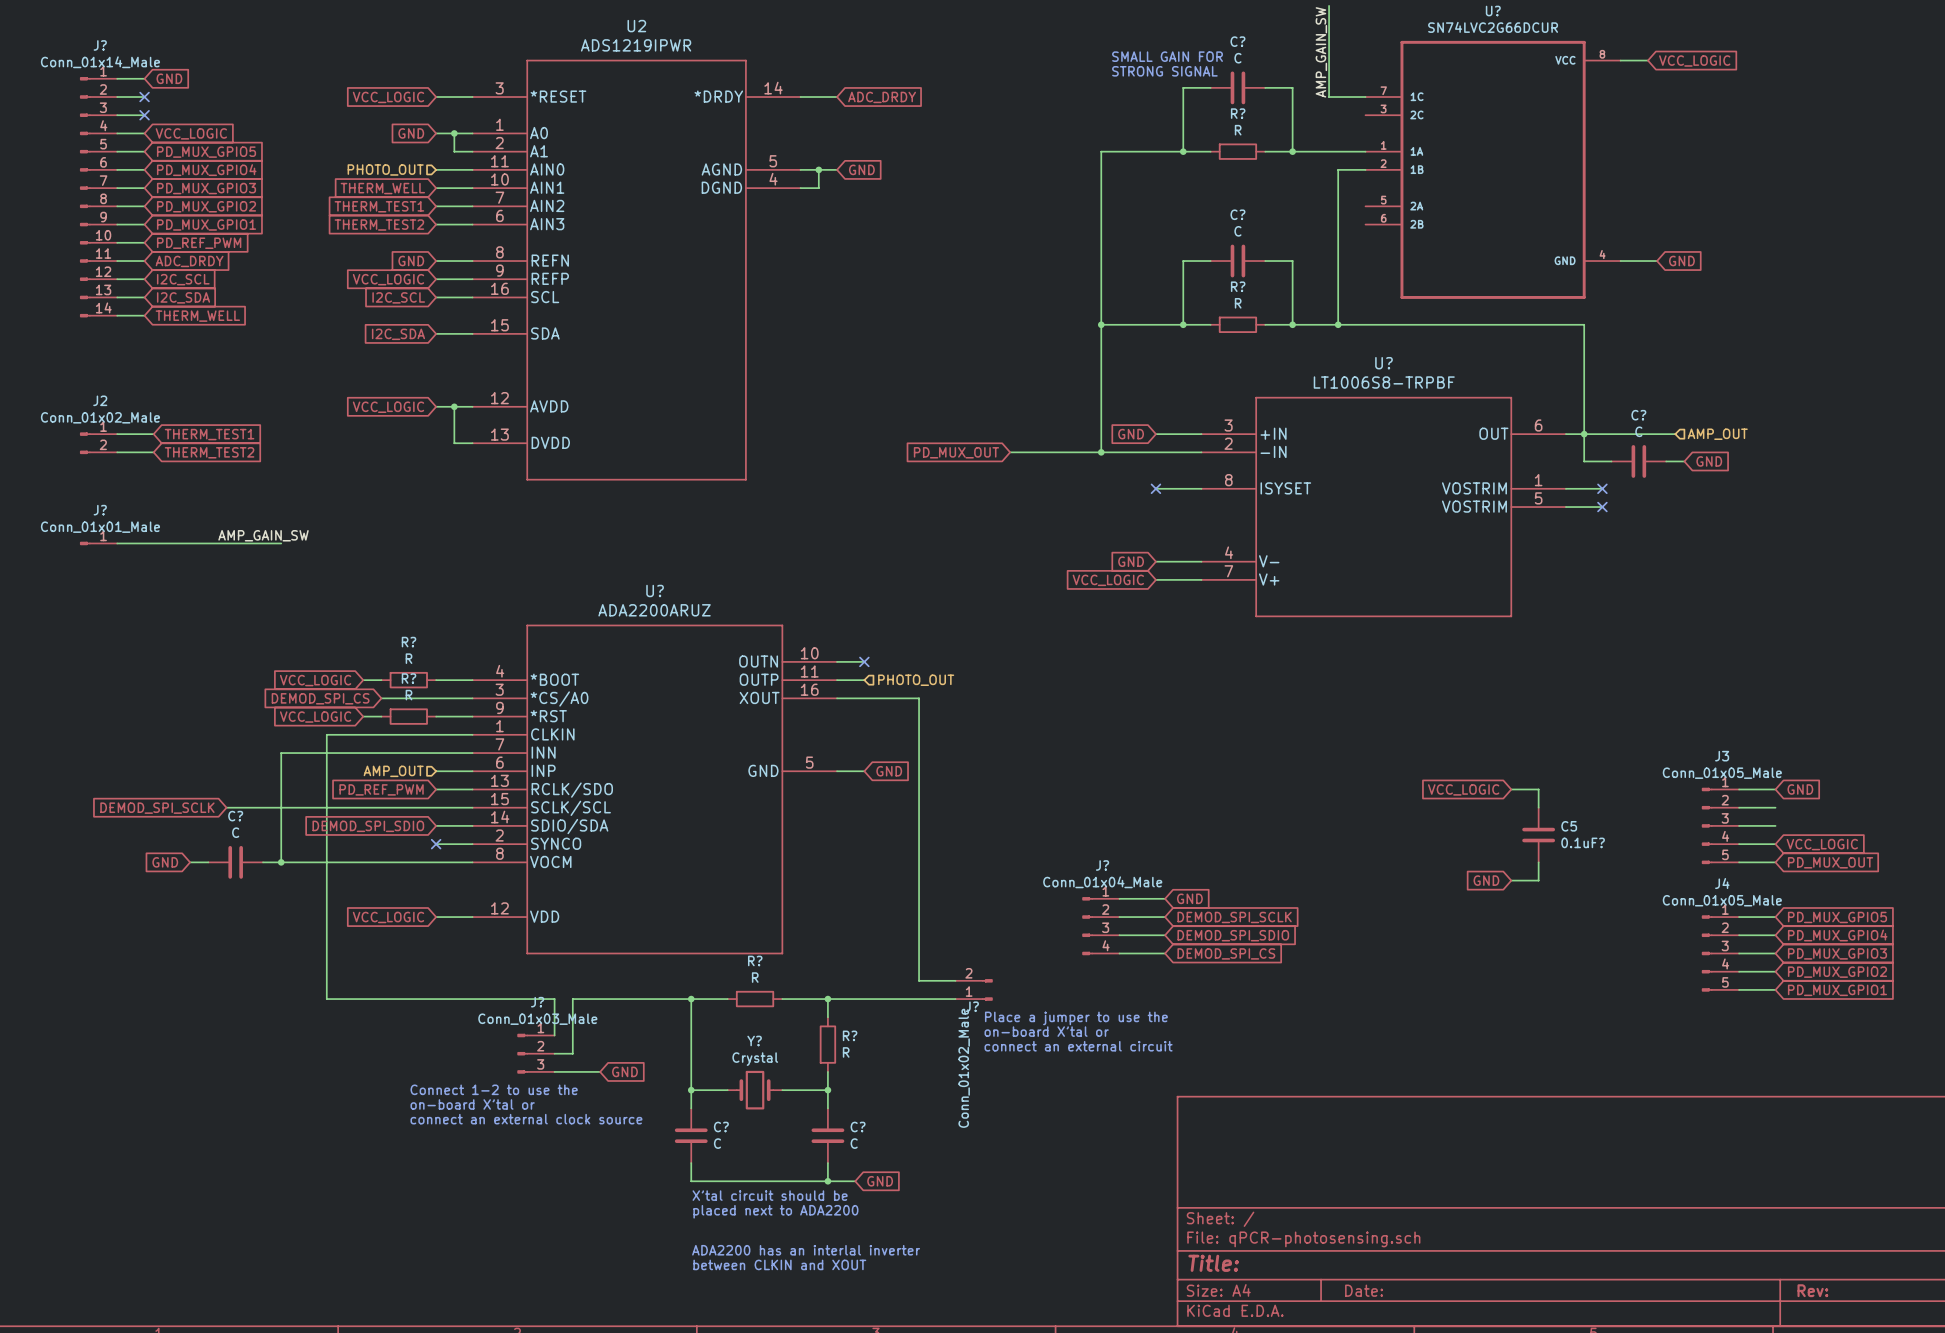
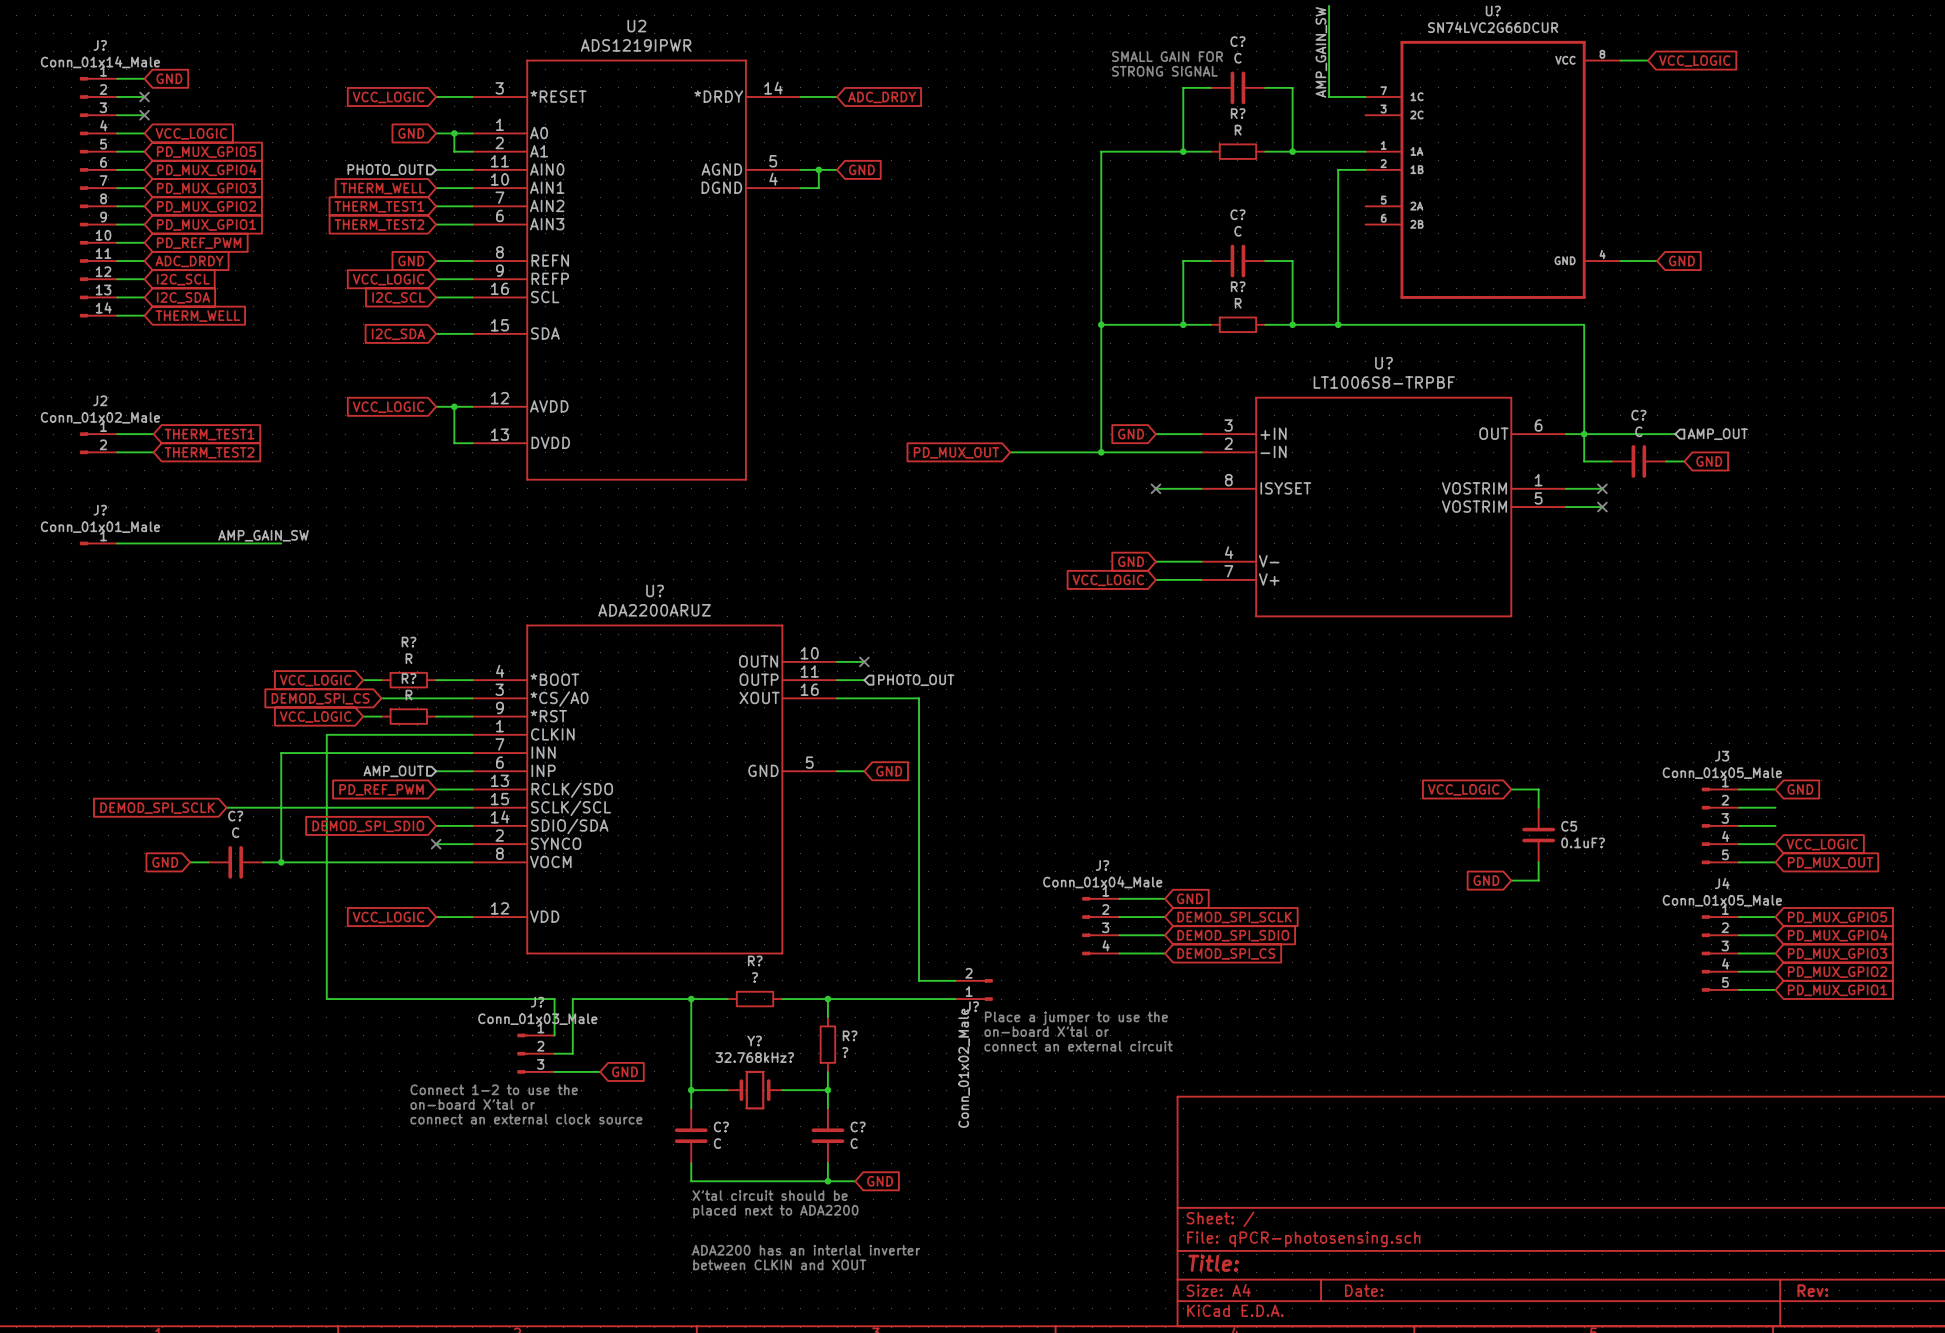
R? value: R (755, 977) -> ? (755, 977)
R? value: R (846, 1052) -> ? (845, 1052)
Y? value: Crystal (755, 1059) -> 32.768kHz? (754, 1057)

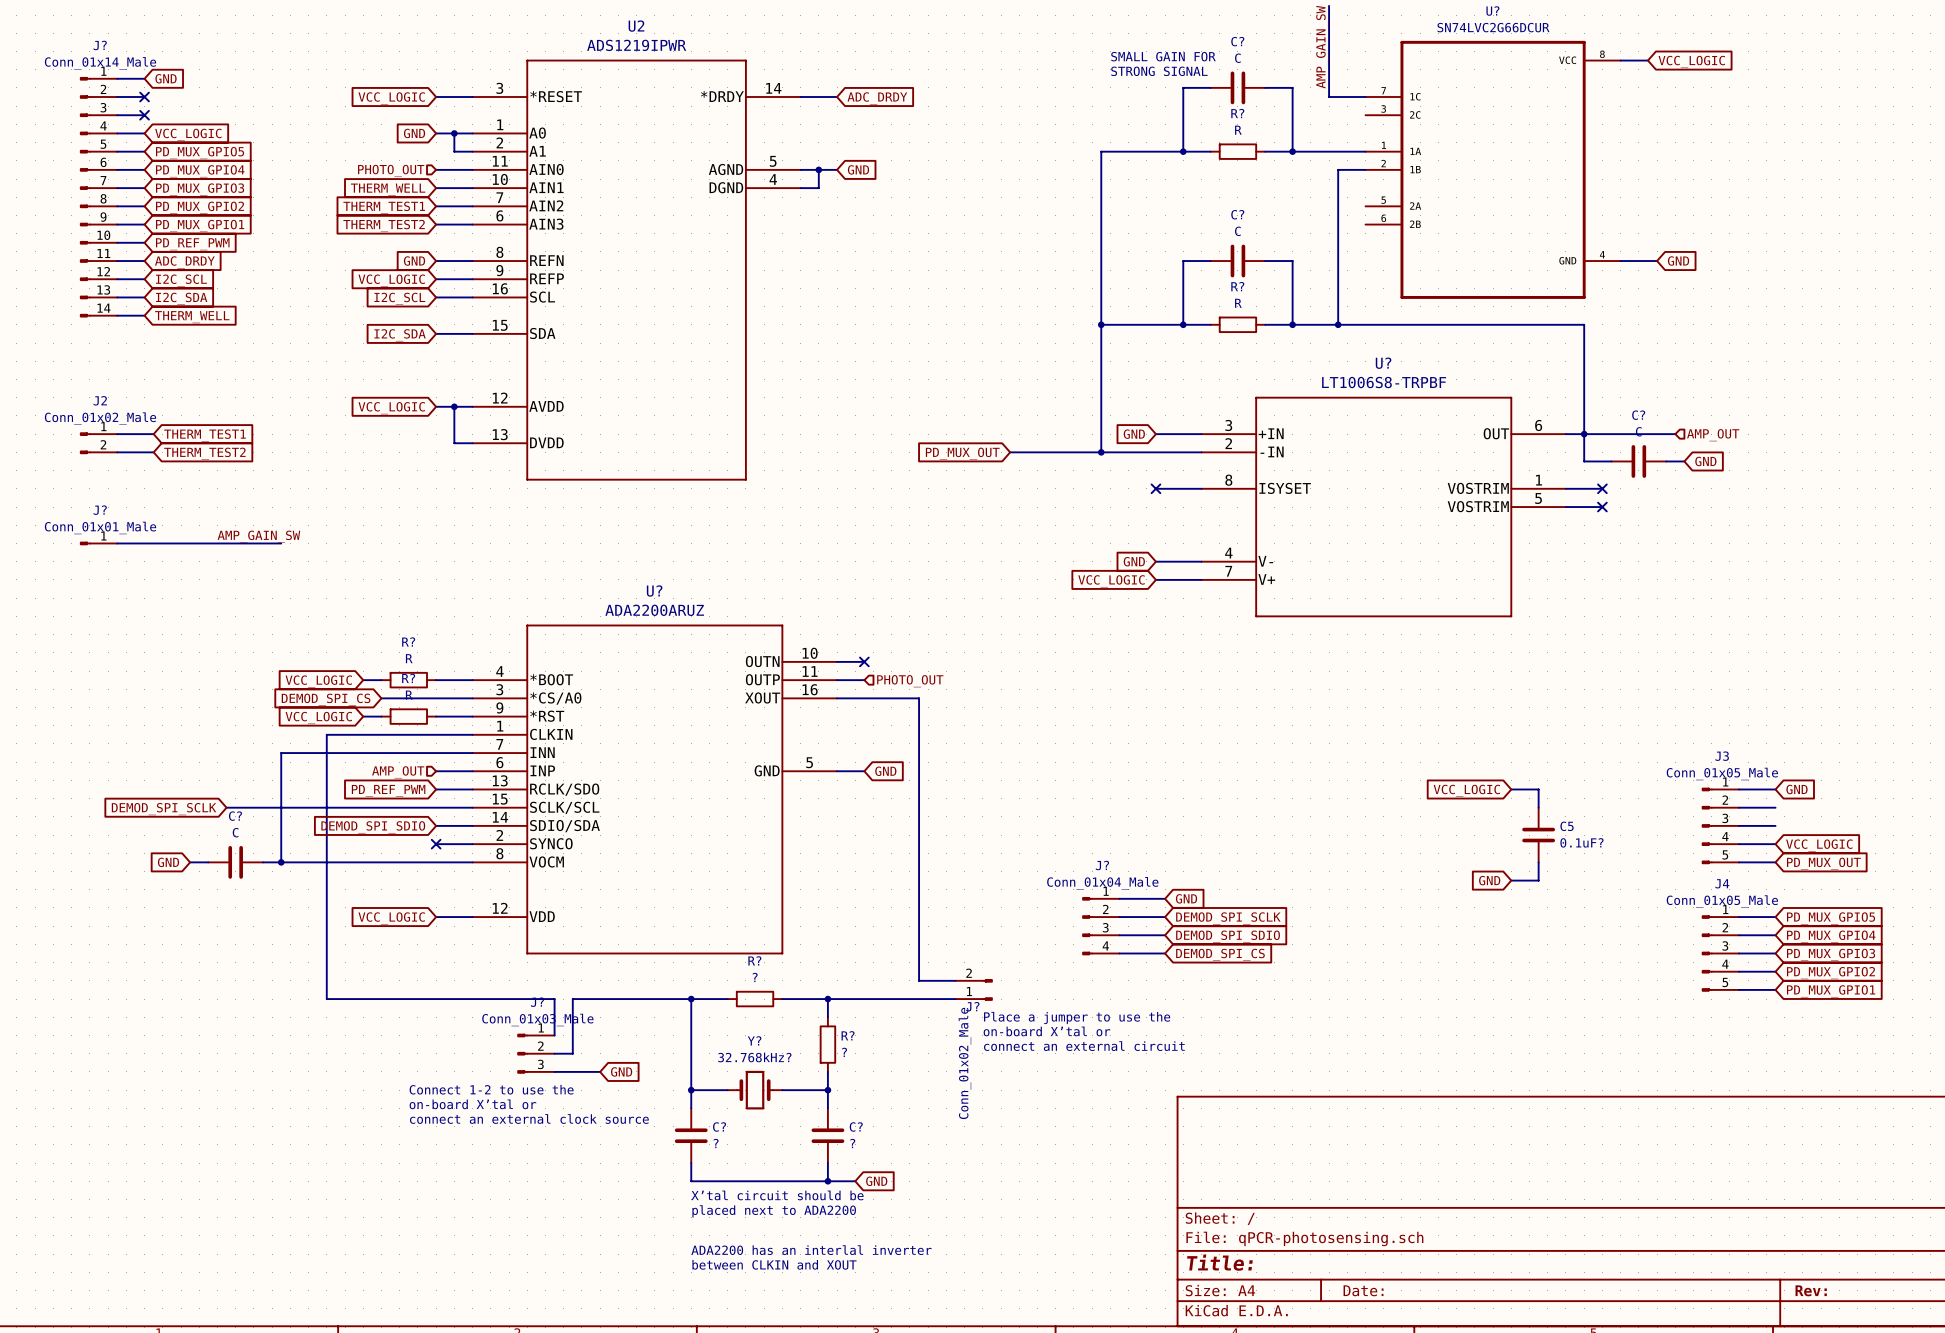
C? value: C (717, 1143) -> ? (716, 1143)
C? value: C (854, 1143) -> ? (852, 1143)

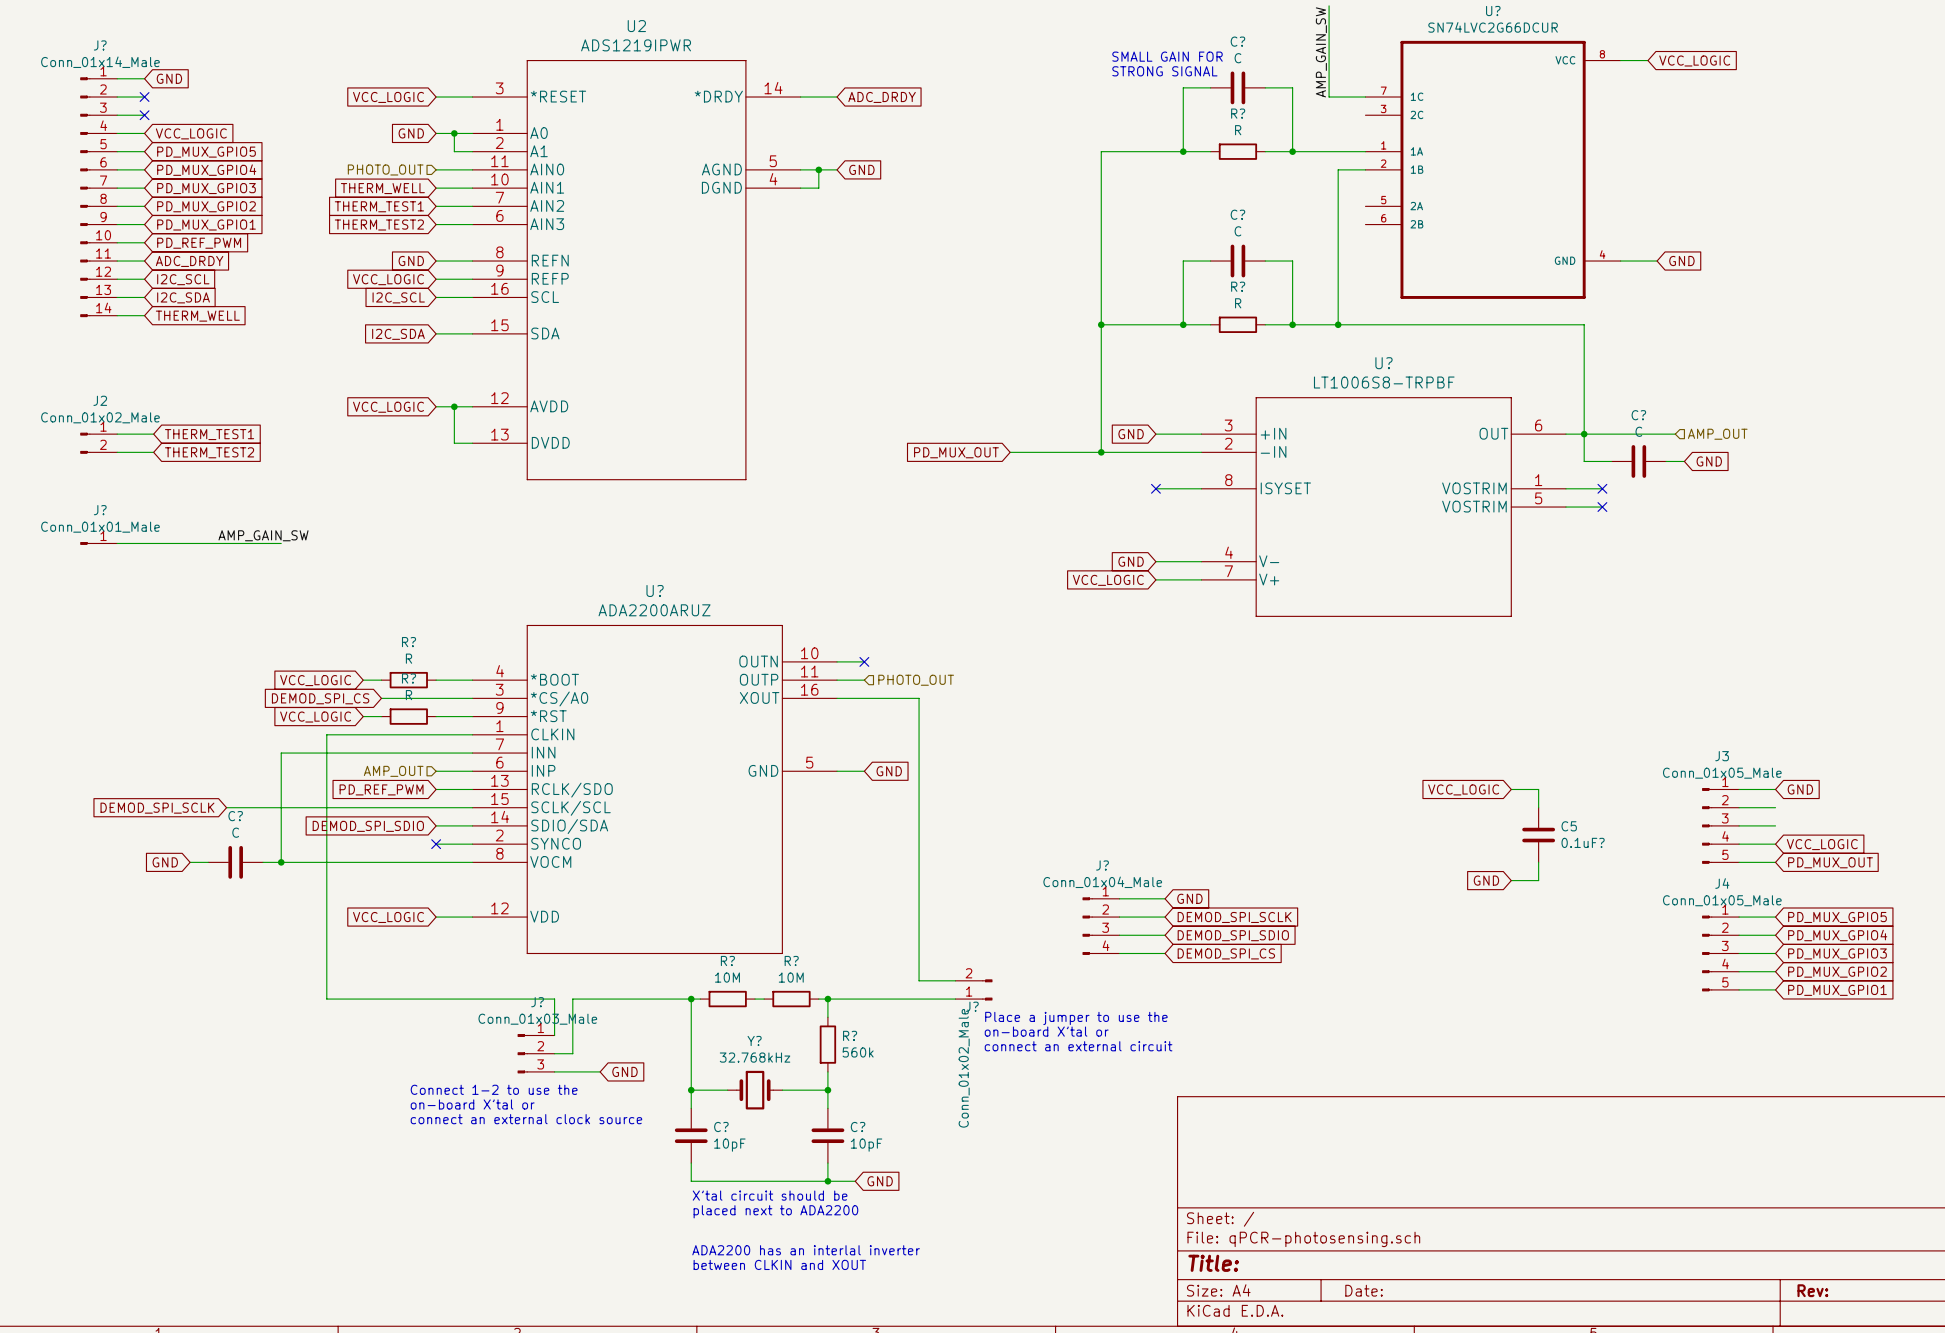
wire: (700, 999) (727, 999) -> none
R?: none -> 10M (727, 999)
wire: none -> (755, 999) (764, 999)
R?: ? (755, 999) -> none
wire: (782, 999) (818, 999) -> none
R?: none -> 10M (791, 999)
R? value: ? (844, 1052) -> 560k (858, 1052)
Y? value: 32.768kHz? (754, 1057) -> 32.768kHz (755, 1057)
C? value: ? (716, 1143) -> 10pF (729, 1145)
C? value: ? (852, 1143) -> 10pF (866, 1145)

